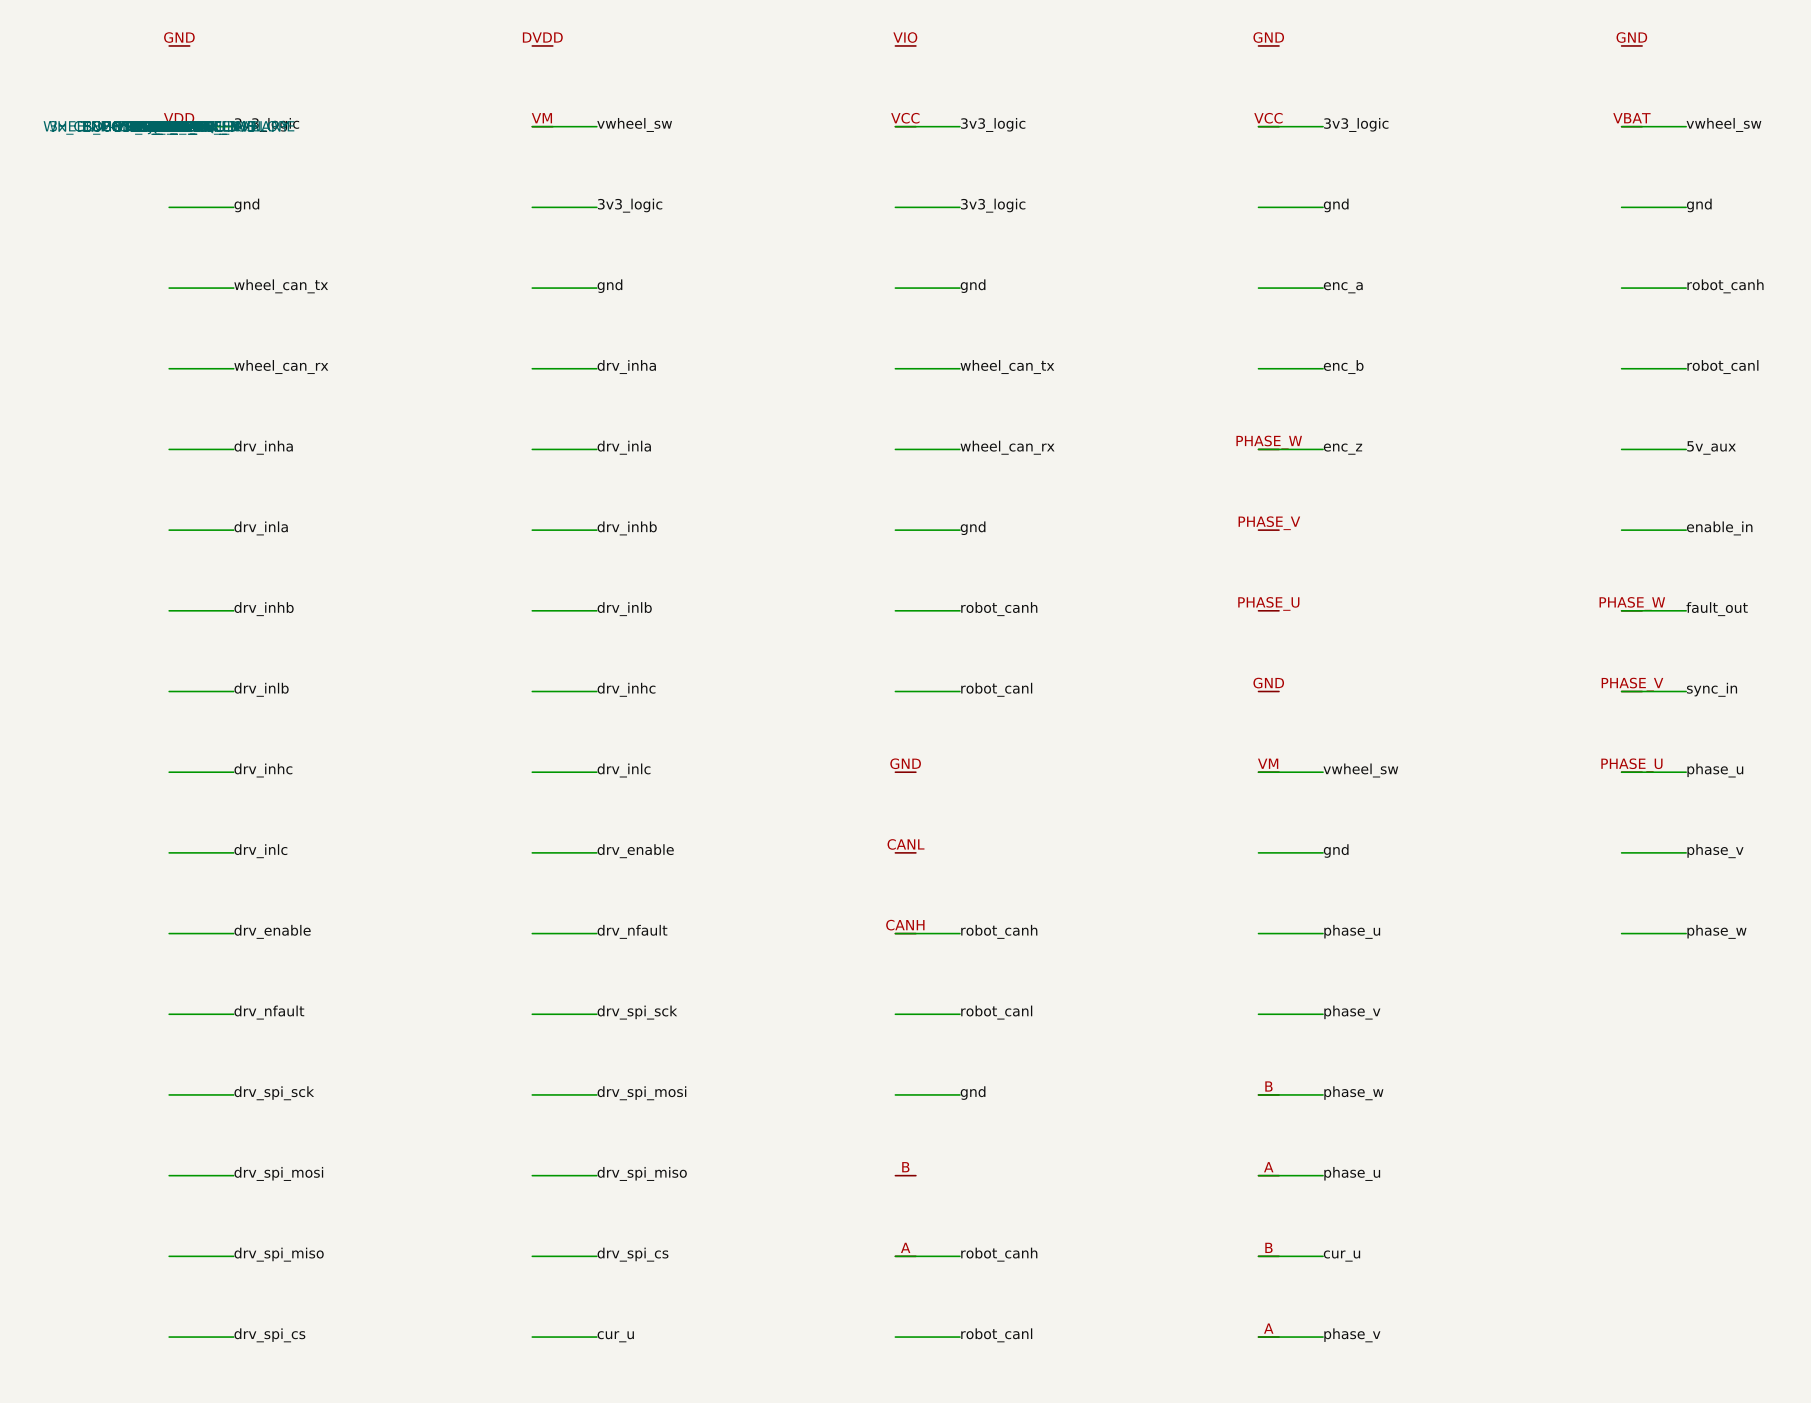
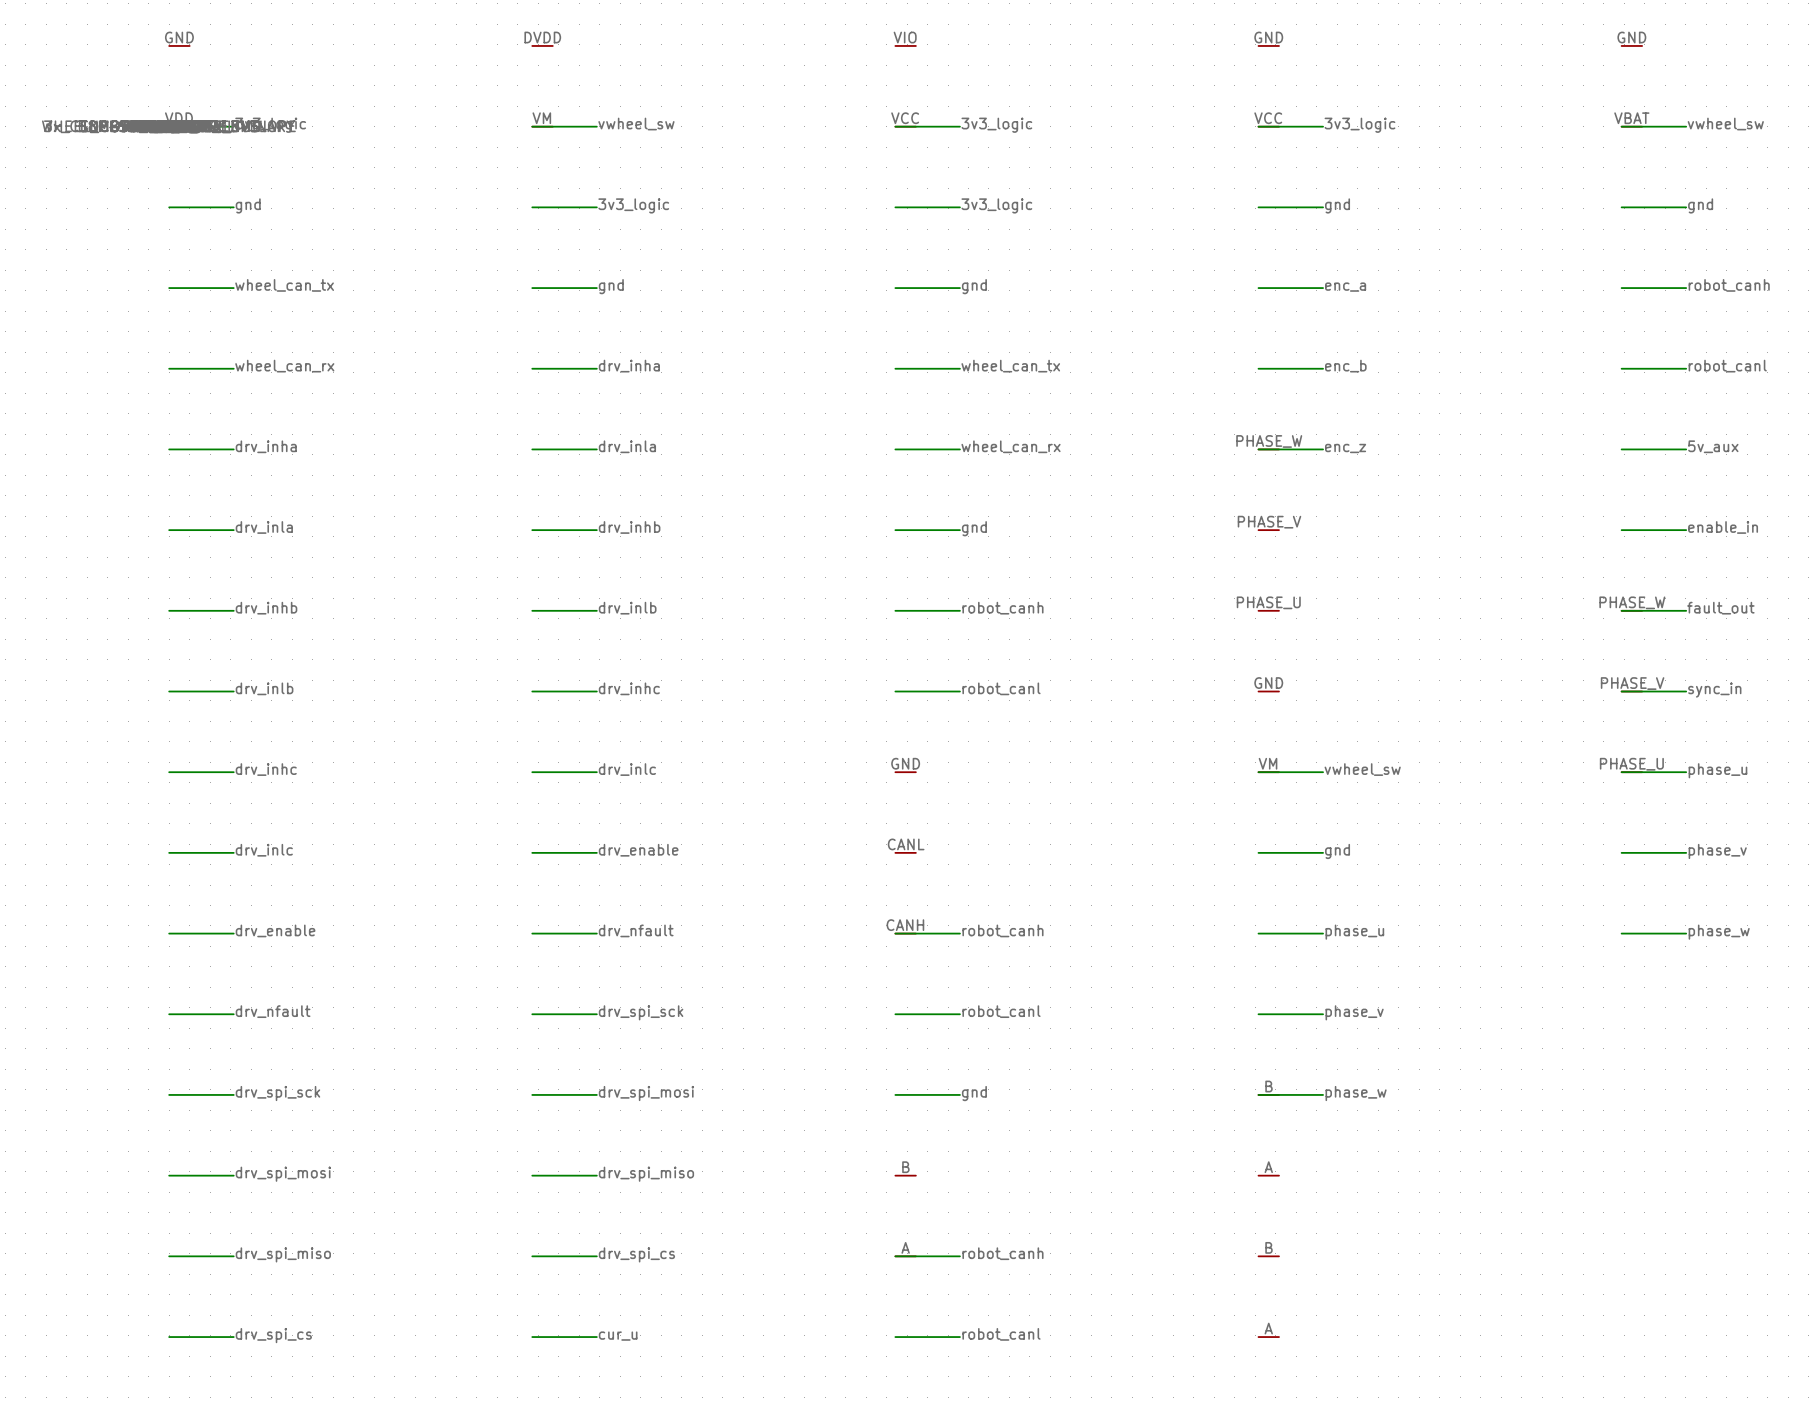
label: phase_u (1352, 1173) -> none
wire: (1258, 1175) (1323, 1175) -> none
wire: (1258, 1256) (1323, 1256) -> none
label: cur_u (1341, 1256) -> none
label: phase_v (1352, 1335) -> none
wire: (1258, 1337) (1323, 1337) -> none

